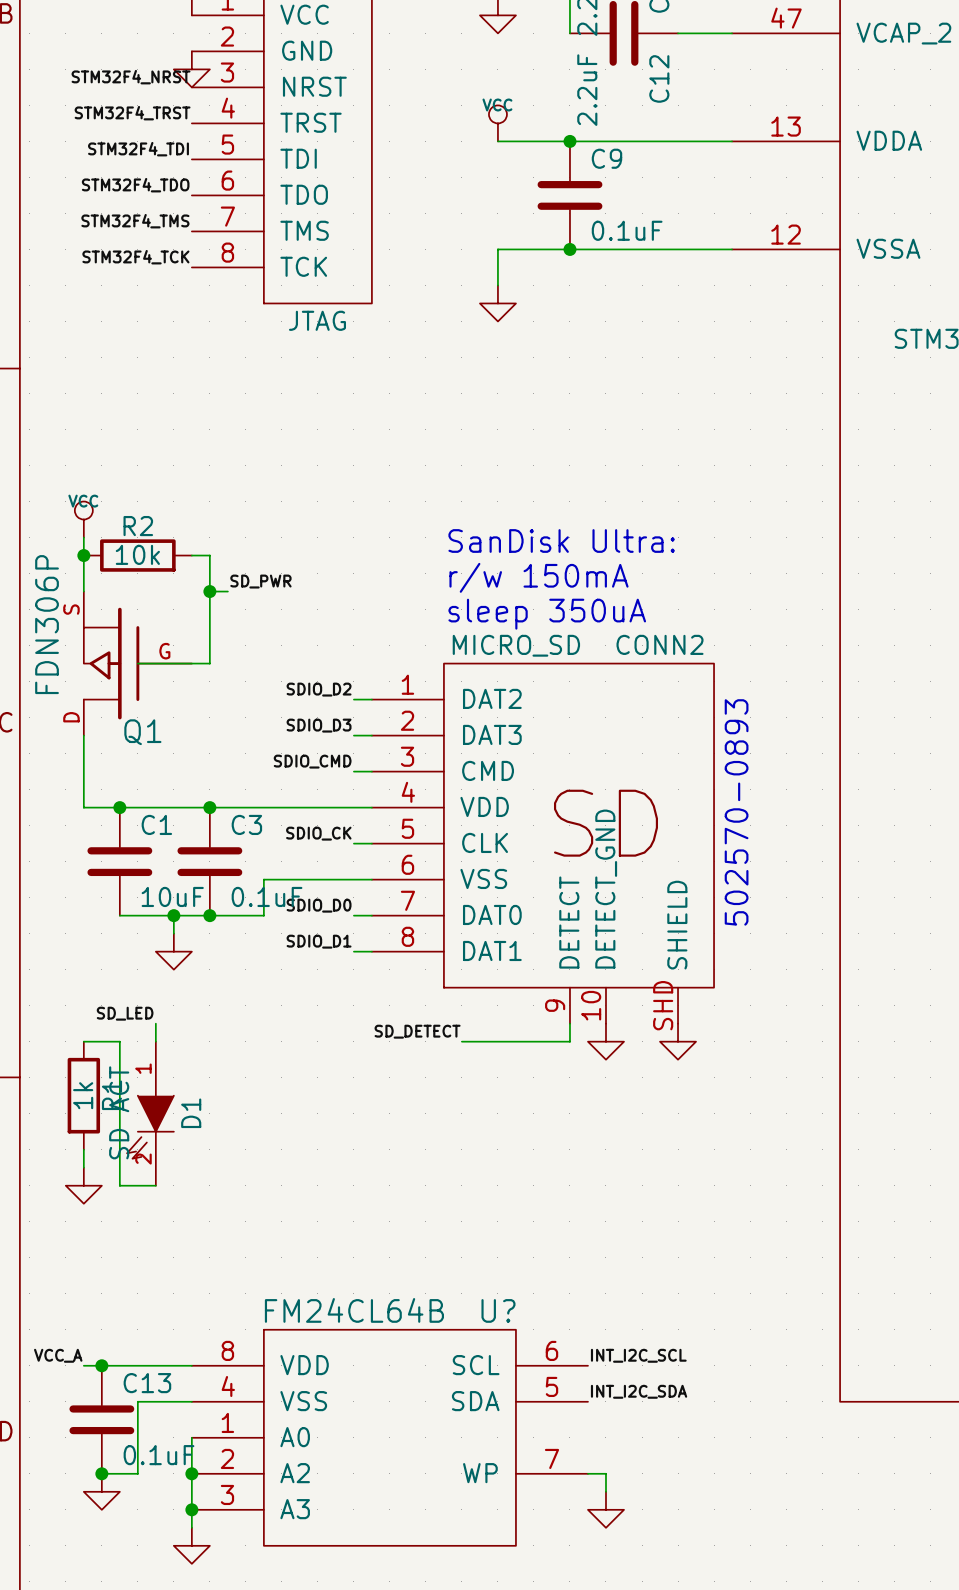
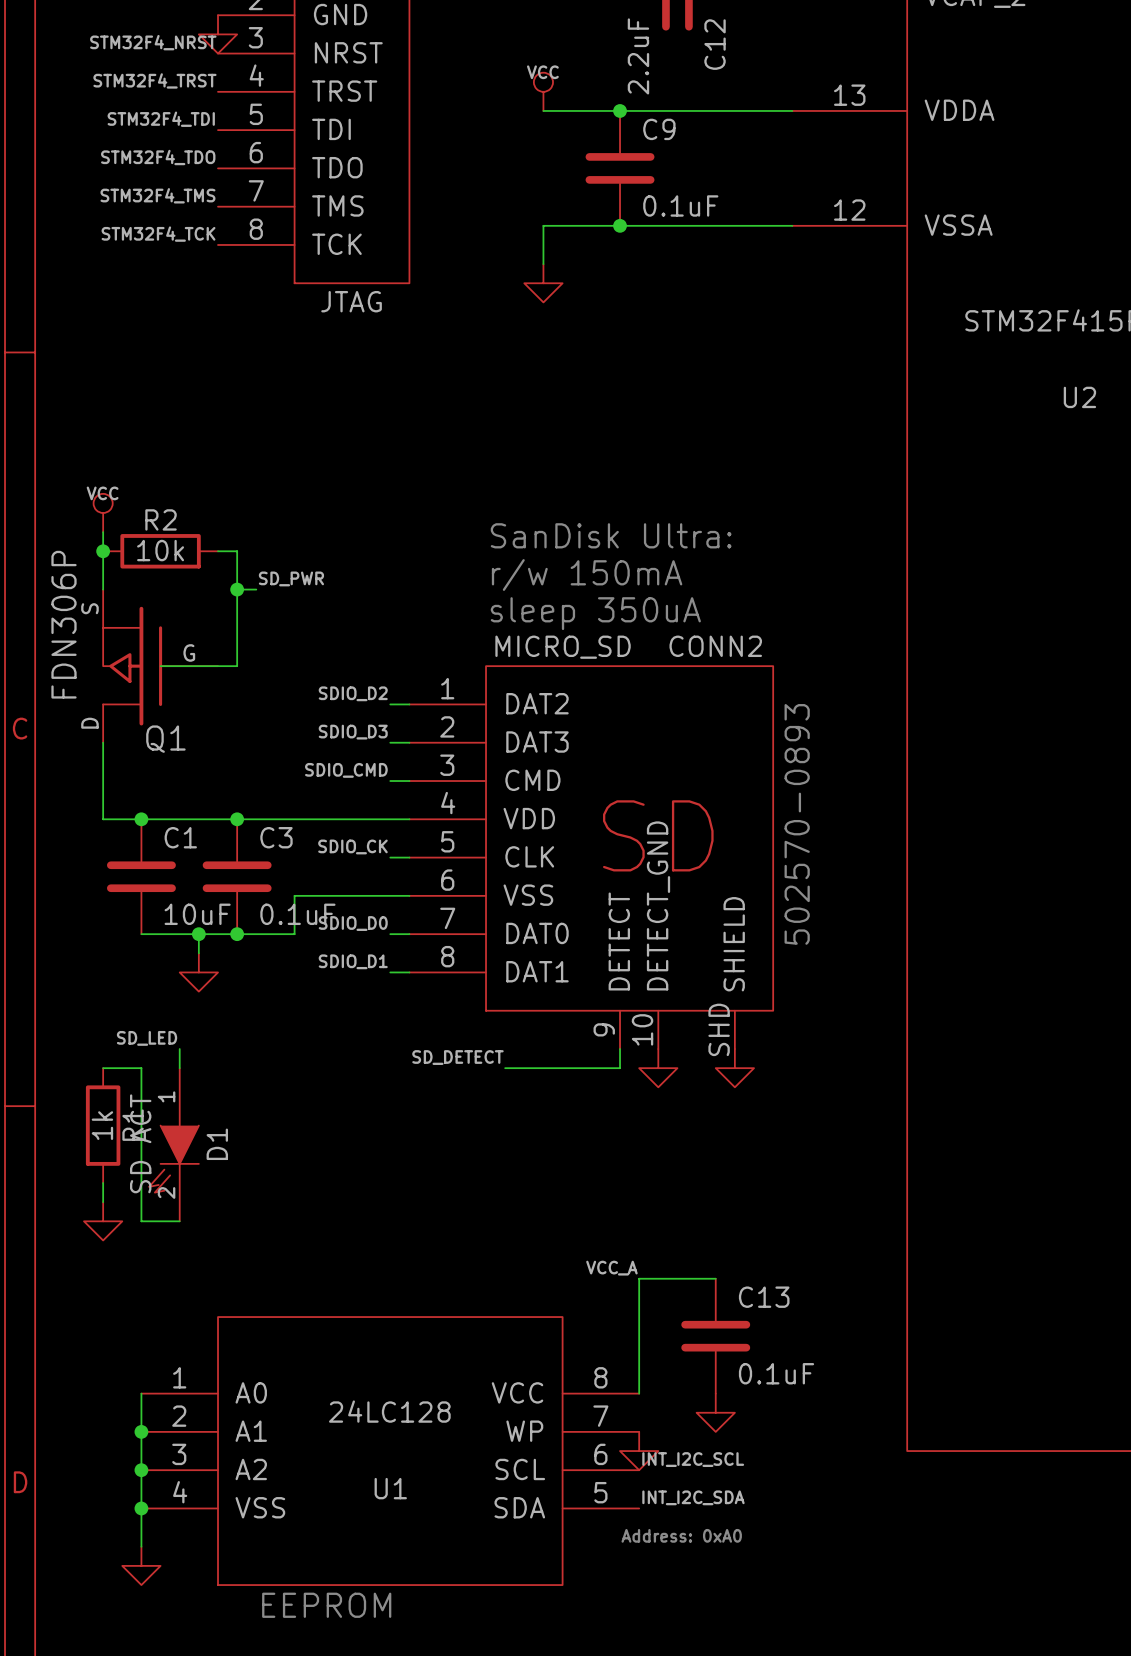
label: none -> VCC_A (611, 1268)
wire: none -> (715, 1278) (639, 1278) (639, 1393)
wire: none -> (141, 1393) (141, 1546)
label: VCC_A (58, 1355) -> none
label position: INT_I2C_SCL (638, 1355) -> INT_I2C_SCL (693, 1459)
wire: (83, 1365) (191, 1365) -> none
junction position: (101, 1365) -> (141, 1431)
power symbol: none -> (715, 1412)
label position: INT_I2C_SDA (639, 1391) -> INT_I2C_SDA (693, 1497)
wire: (191, 1401) (137, 1401) (137, 1473) (101, 1473) -> none
U1: none -> 24LC128 (390, 1451)
power symbol: none -> (639, 1451)
C13 position: (101, 1419) -> (715, 1336)
junction: none -> (141, 1470)
U?: FM24CL64B (389, 1437) -> none
junction position: (101, 1473) -> (141, 1508)
junction: (191, 1473) -> none
wire: (587, 1473) (605, 1473) (605, 1491) -> none
text: none -> Address: 0xA0 (681, 1535)
power symbol position: (101, 1491) -> (141, 1565)
junction: (191, 1509) -> none
power symbol: (605, 1509) -> none
power symbol: (191, 1545) -> none
text: none -> EEPROM (326, 1605)

